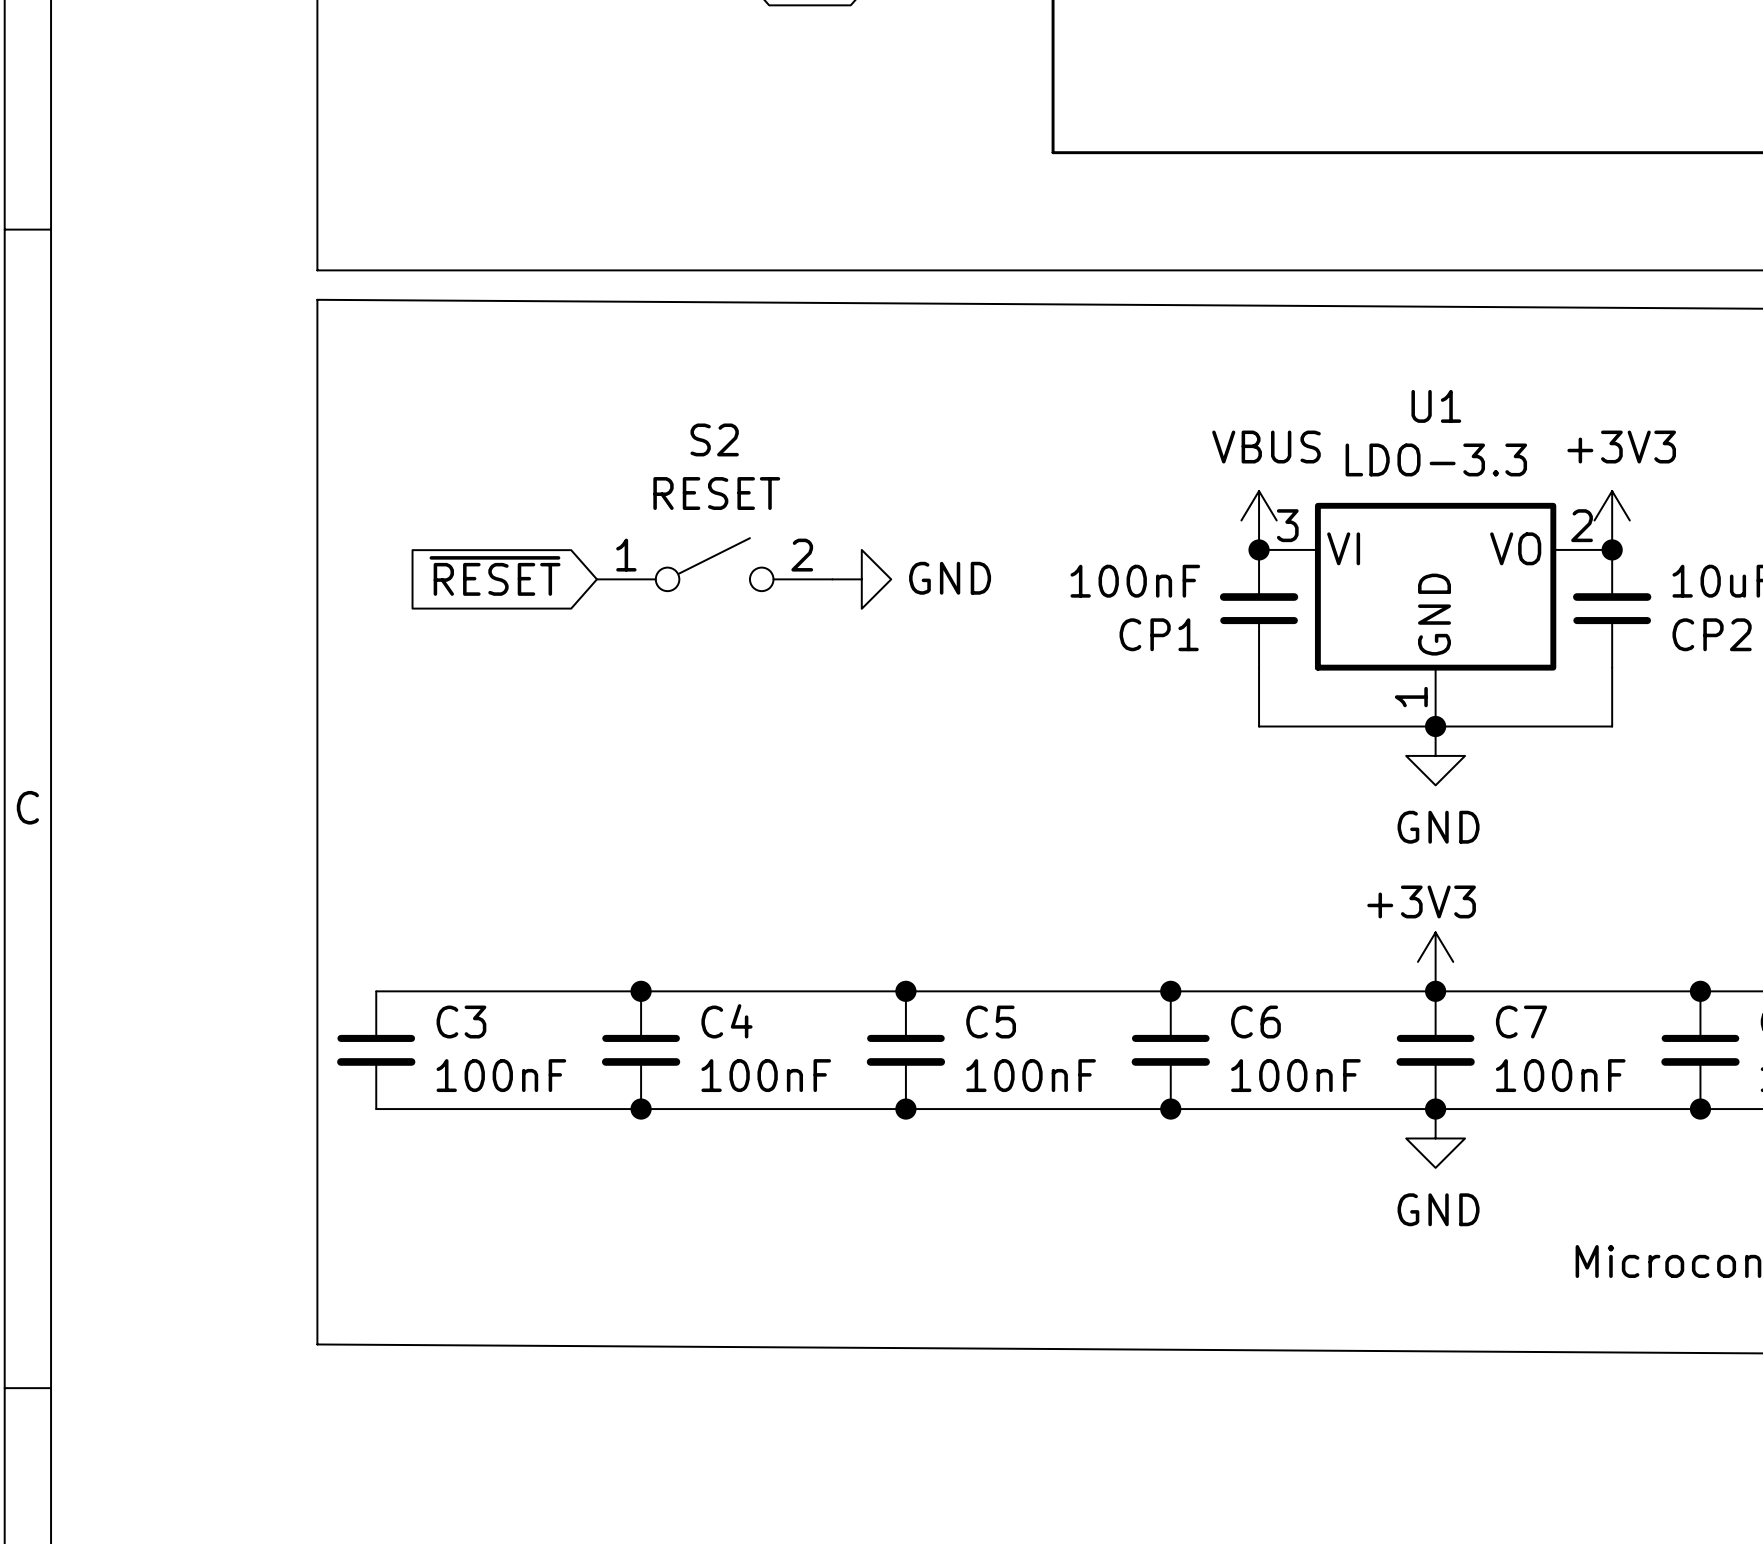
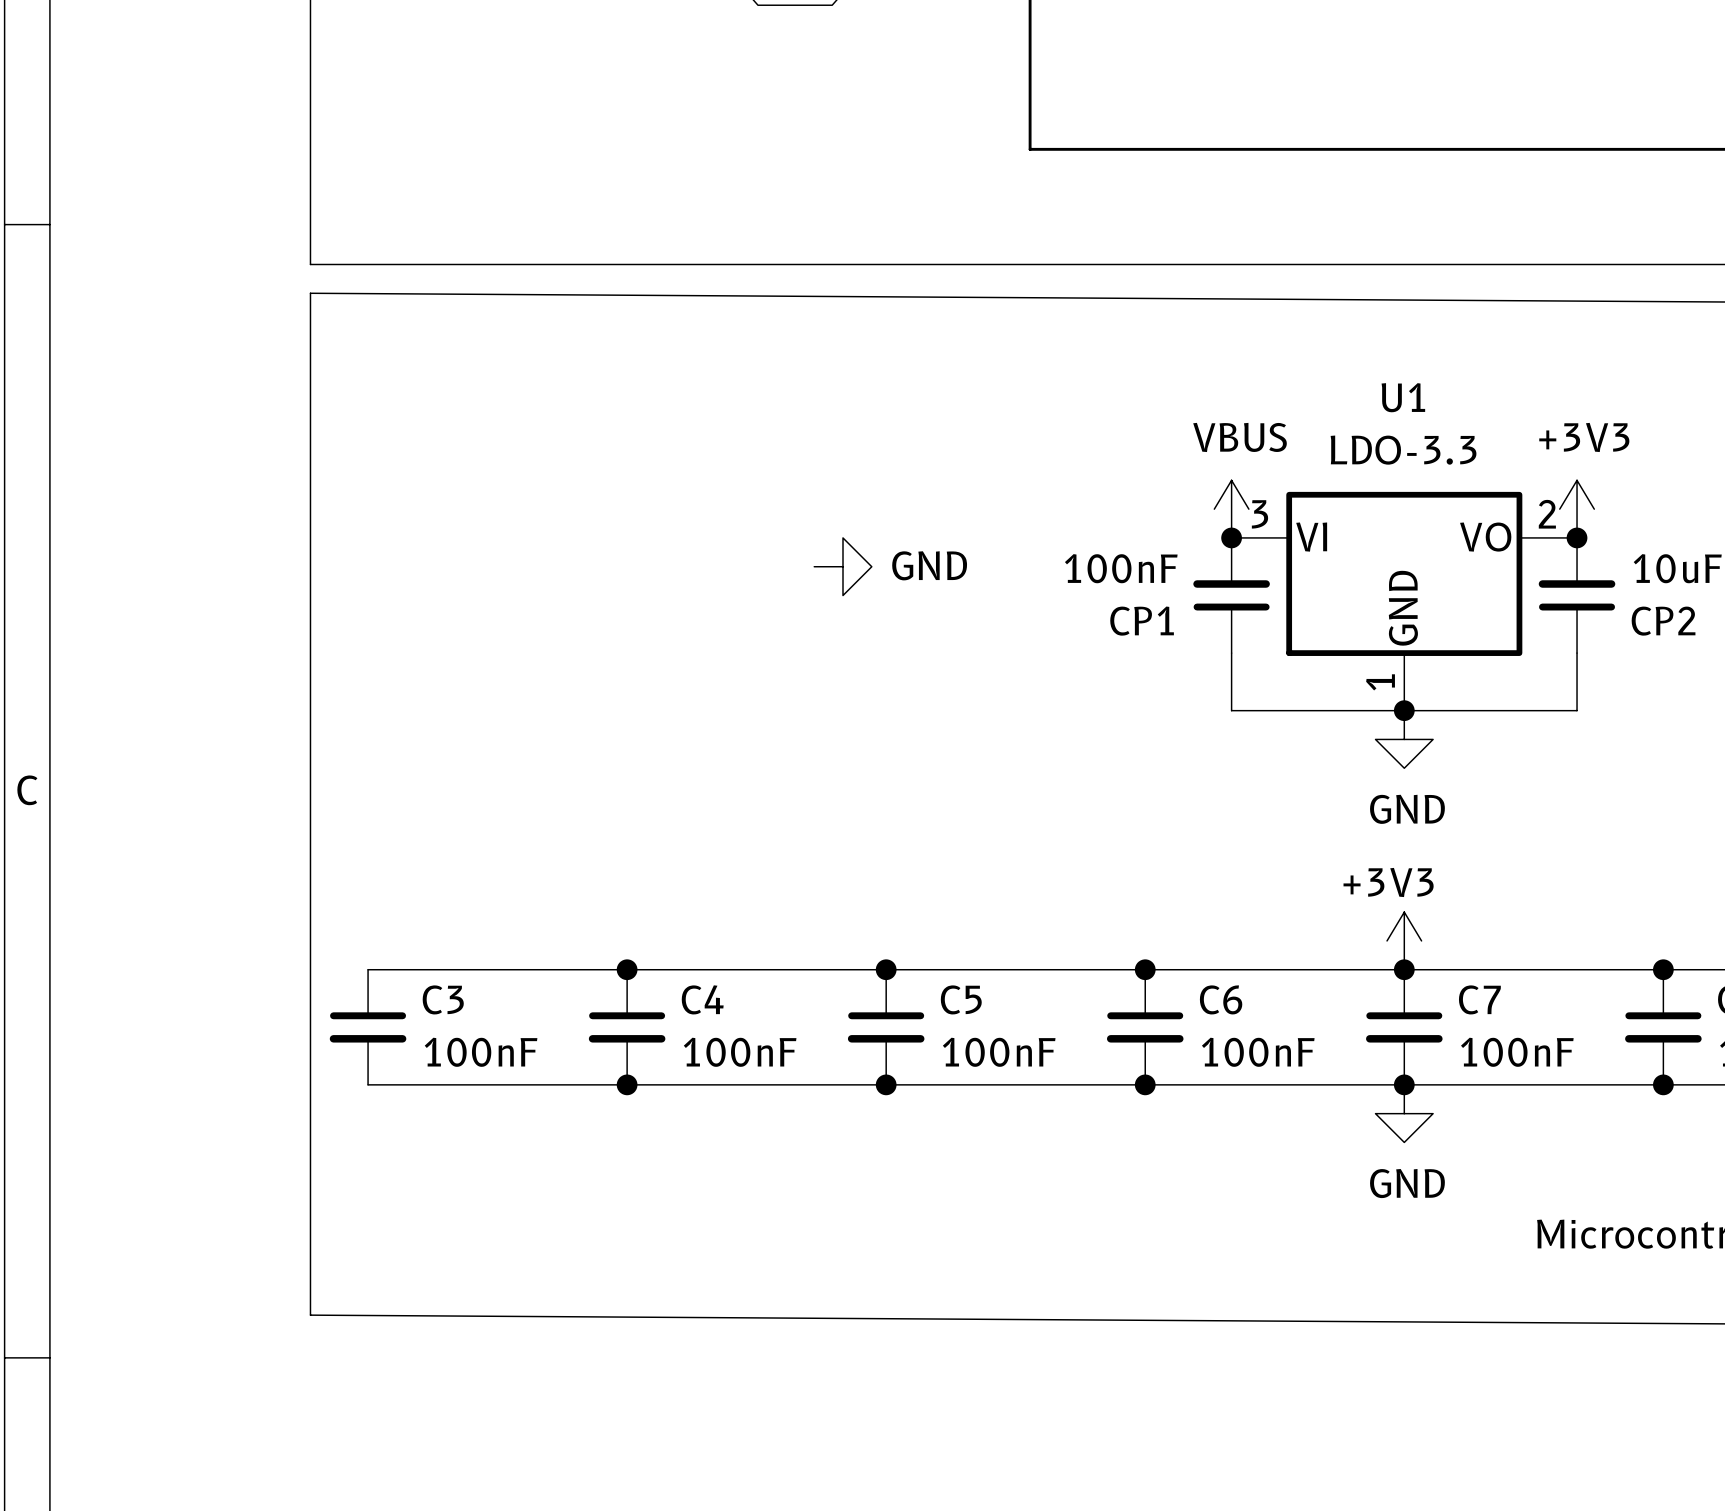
S2: RESET (714, 564) -> none
global label: ~{RESET} (495, 575) -> none

